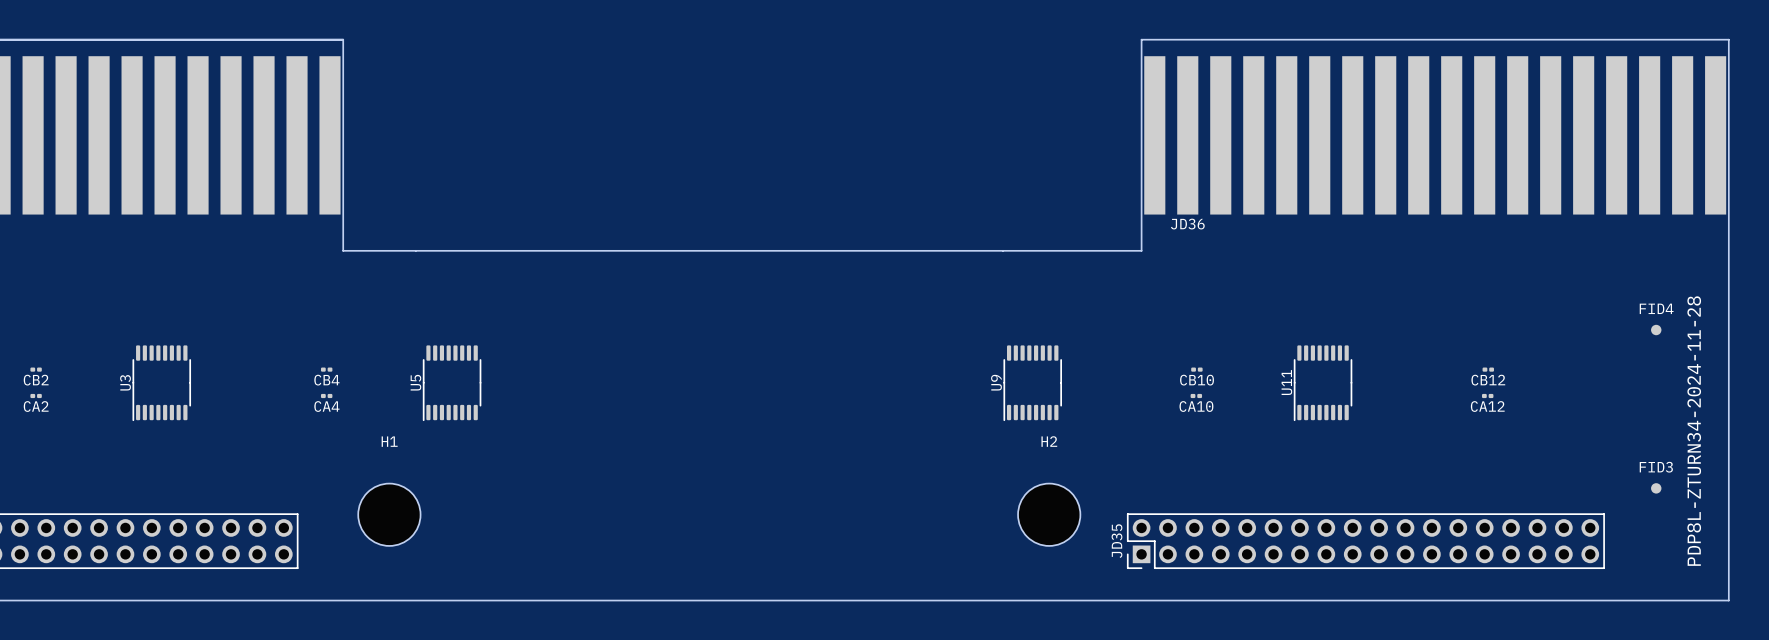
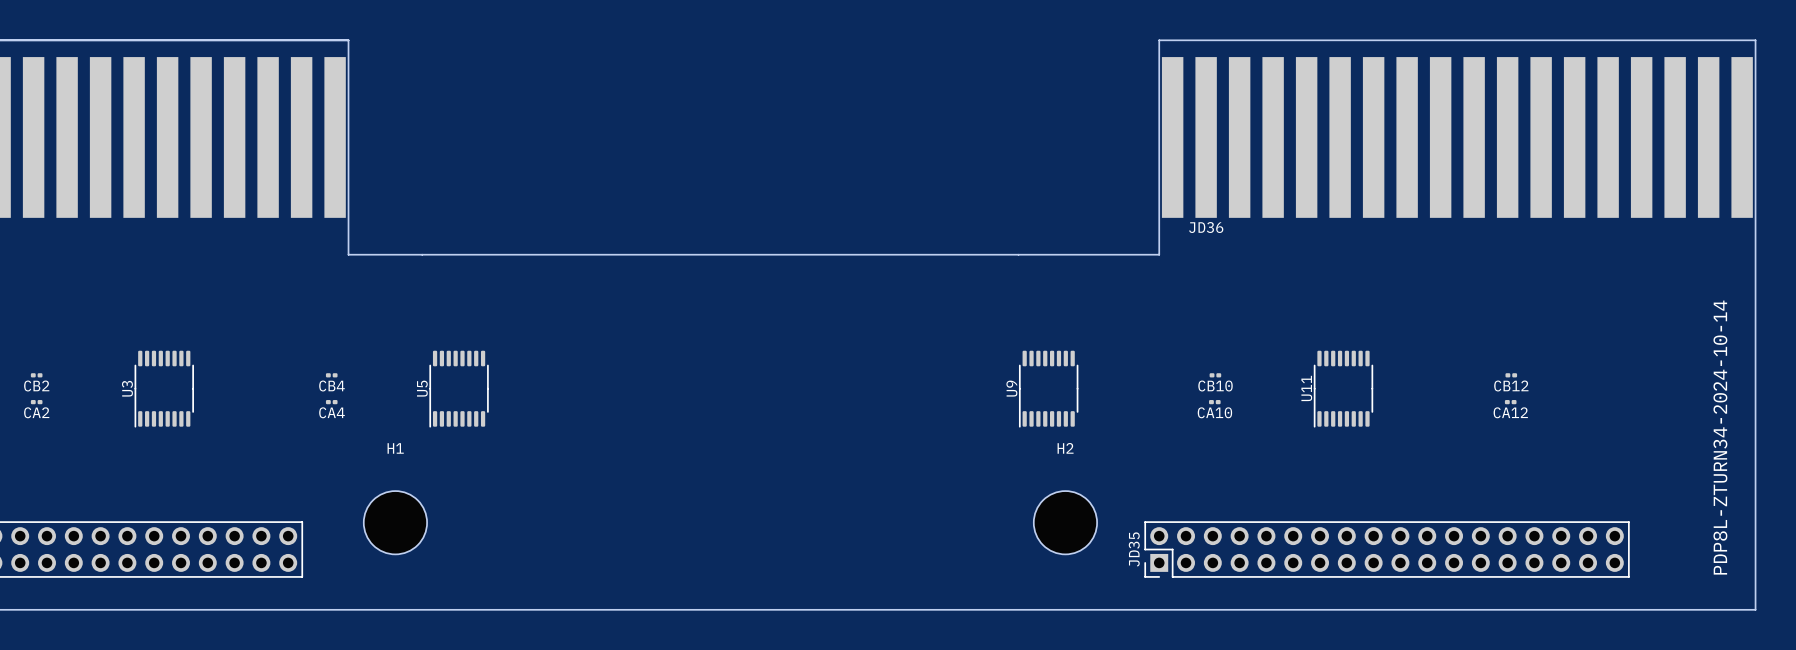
FID4: (1656, 330) -> none
text: PDP8L-ZTURN34-2024-11-28 (1694, 431) -> PDP8L-ZTURN34-2024-10-14 (1720, 437)
FID3: (1656, 488) -> none

